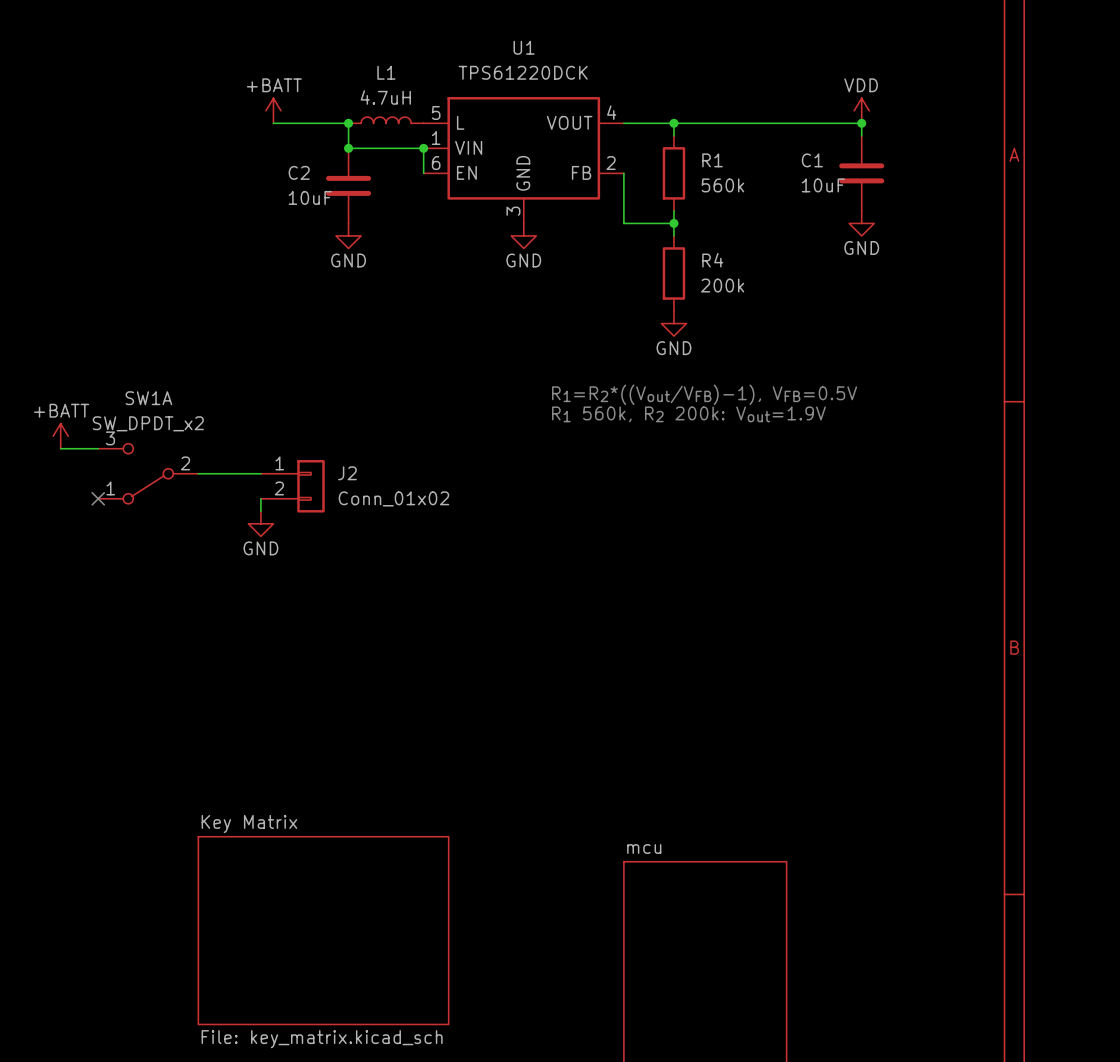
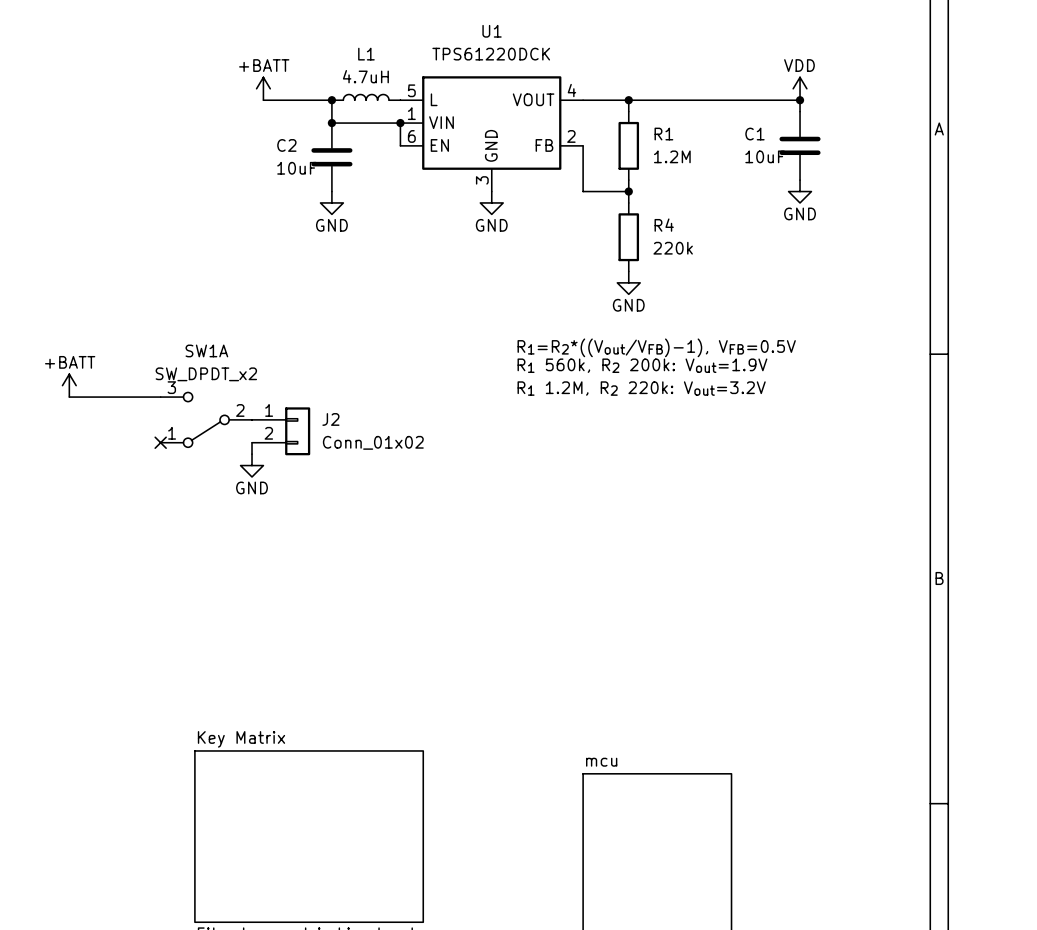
R1 value: 560k (722, 185) -> 1.2M (672, 156)
R4 value: 200k (722, 285) -> 220k (673, 248)
text: none -> R1 1.2M, R2 220k: Vout=3.2V (641, 388)
SW1A position: (148, 473) -> (206, 419)
wire: (198, 473) (260, 473) -> (103, 397) (160, 397)
no-connect mark: (98, 498) -> none
no-connect mark: none -> (160, 442)

